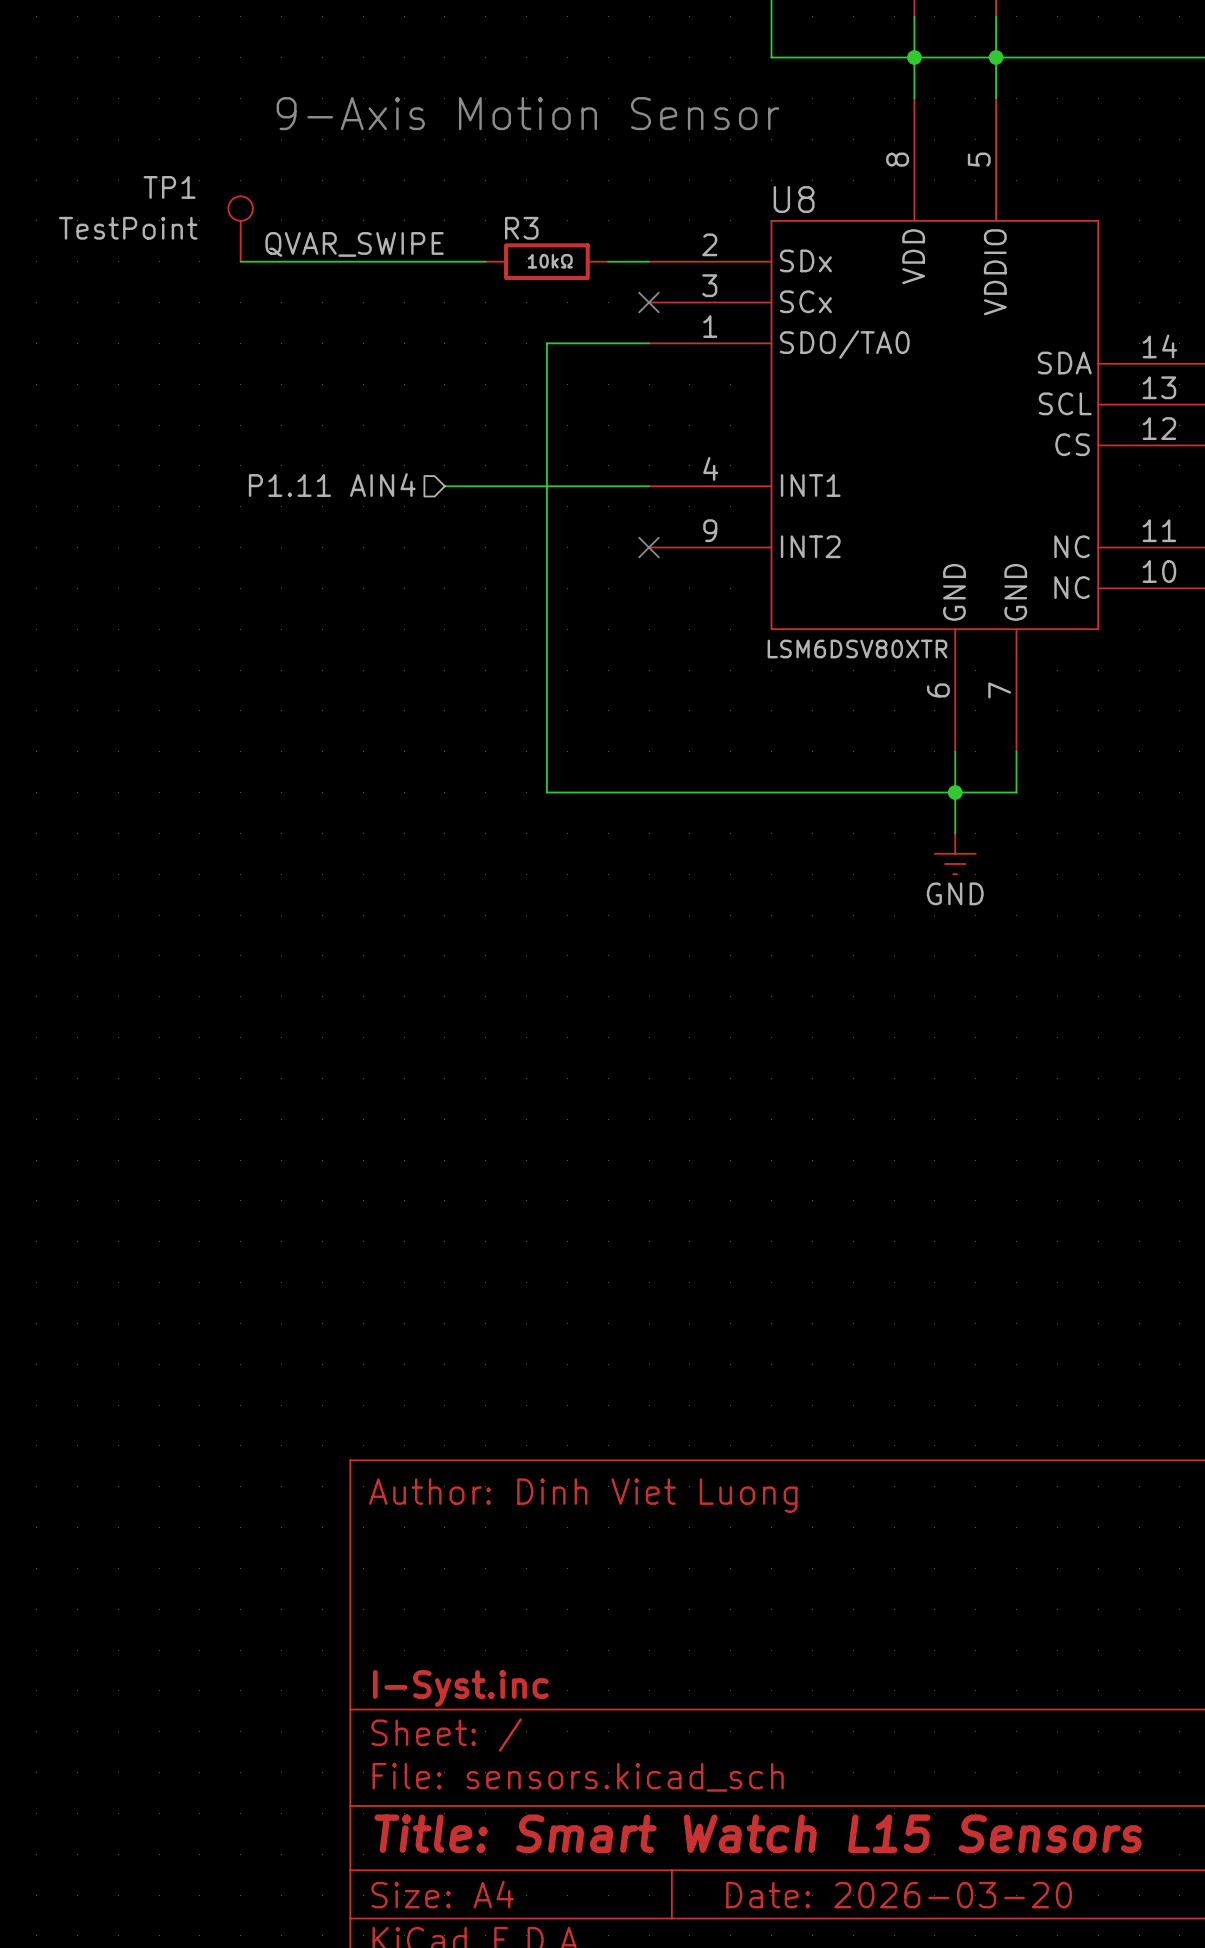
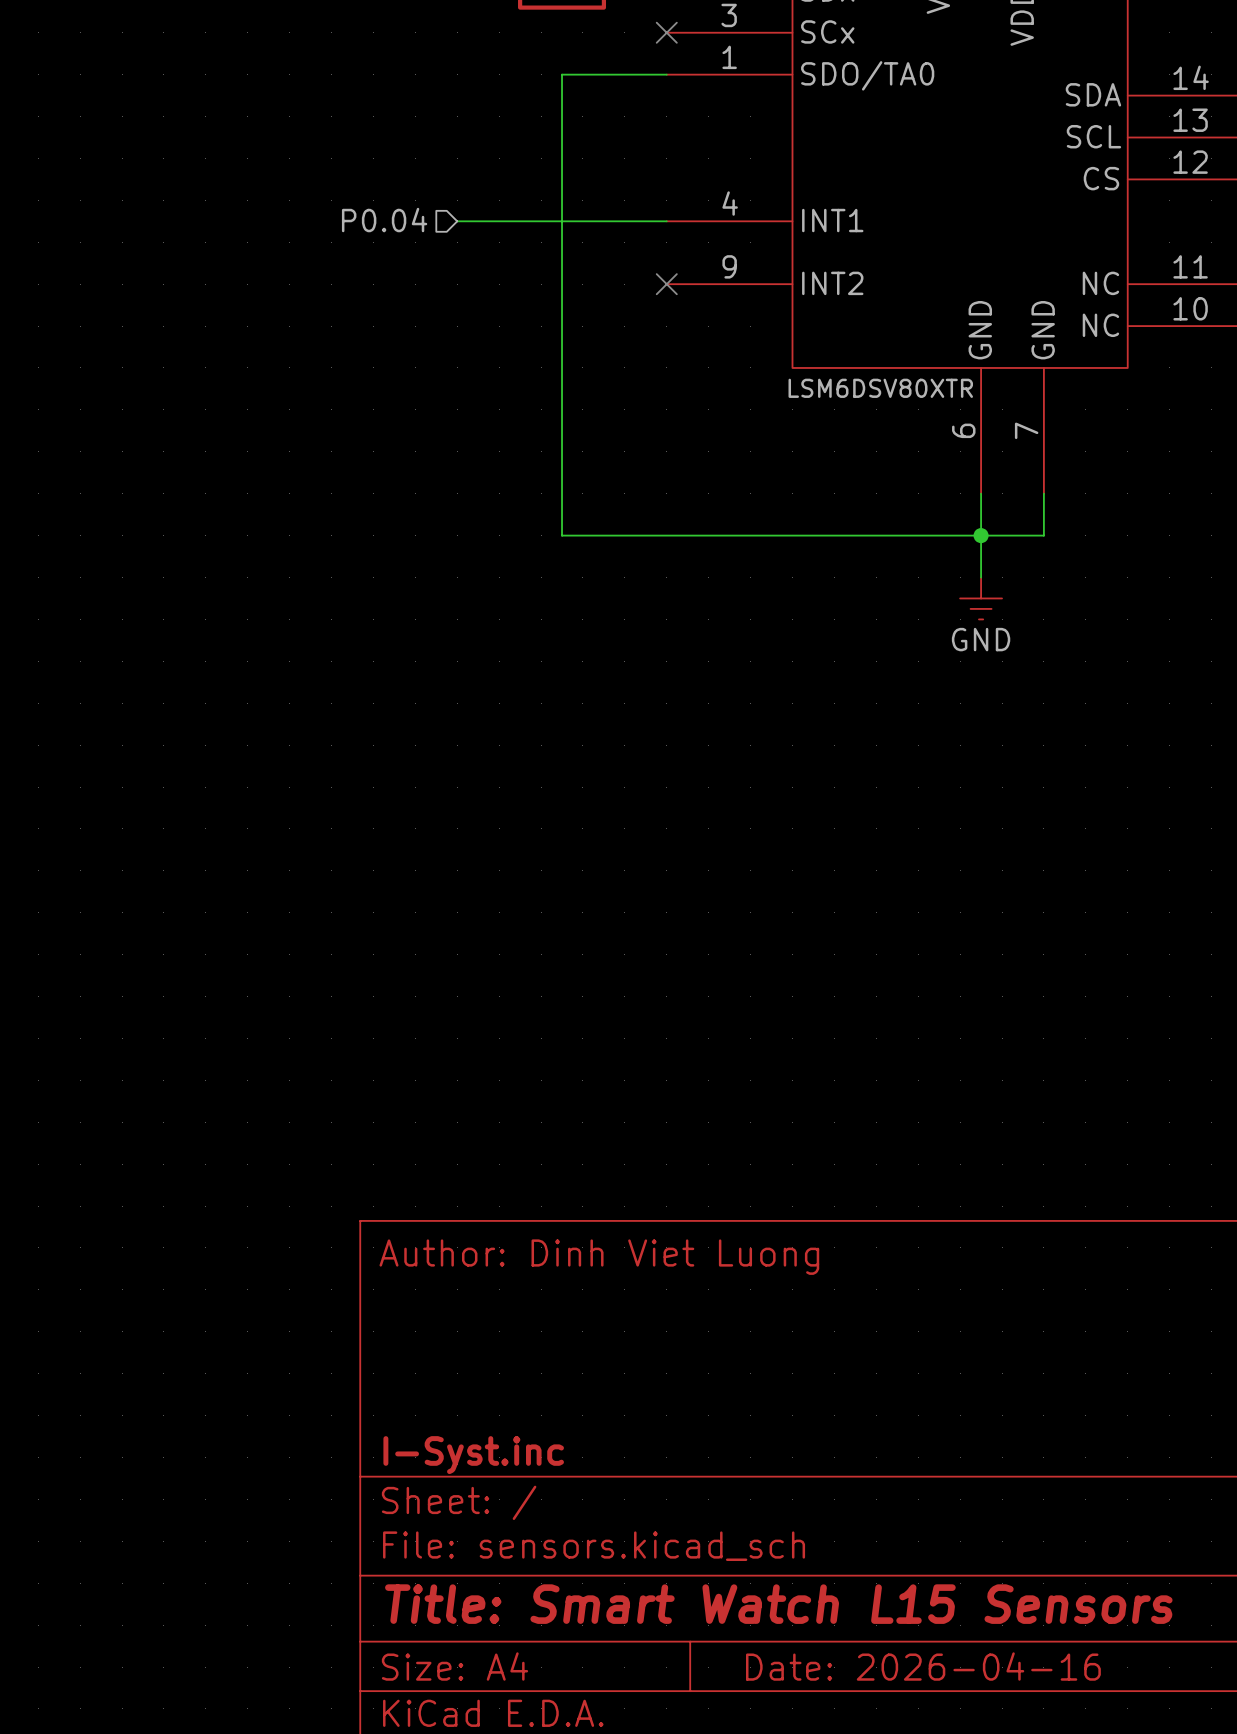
hierarchical label: P1.11 AIN4 (332, 485) -> P0.04 (384, 220)
title block: Date: 2026-03-20 (899, 1895) -> Date: 2026-04-16 (923, 1666)

